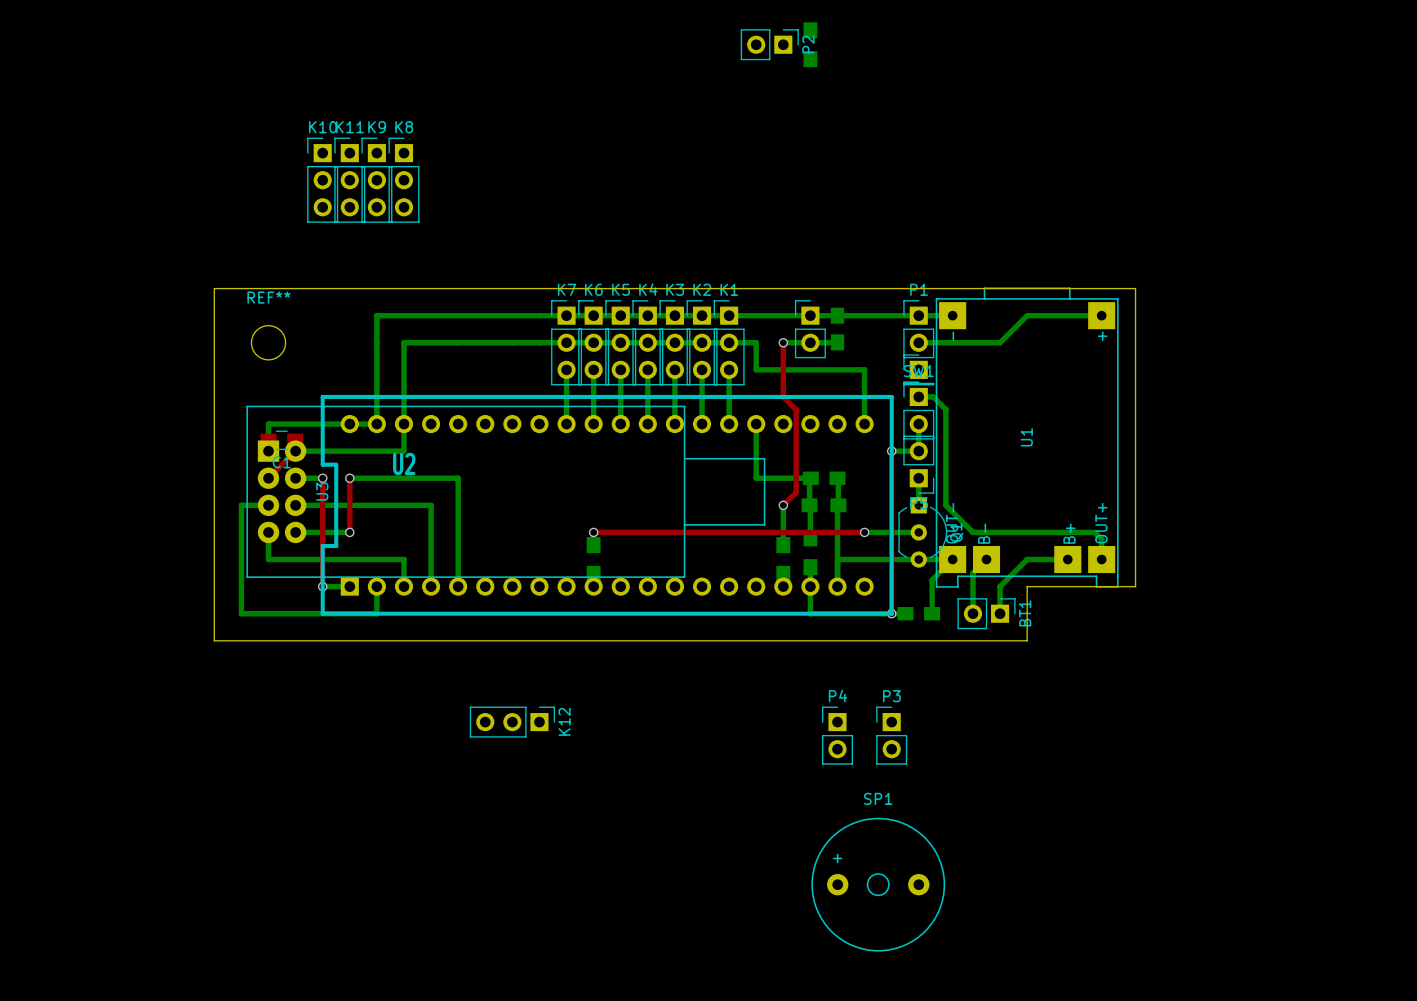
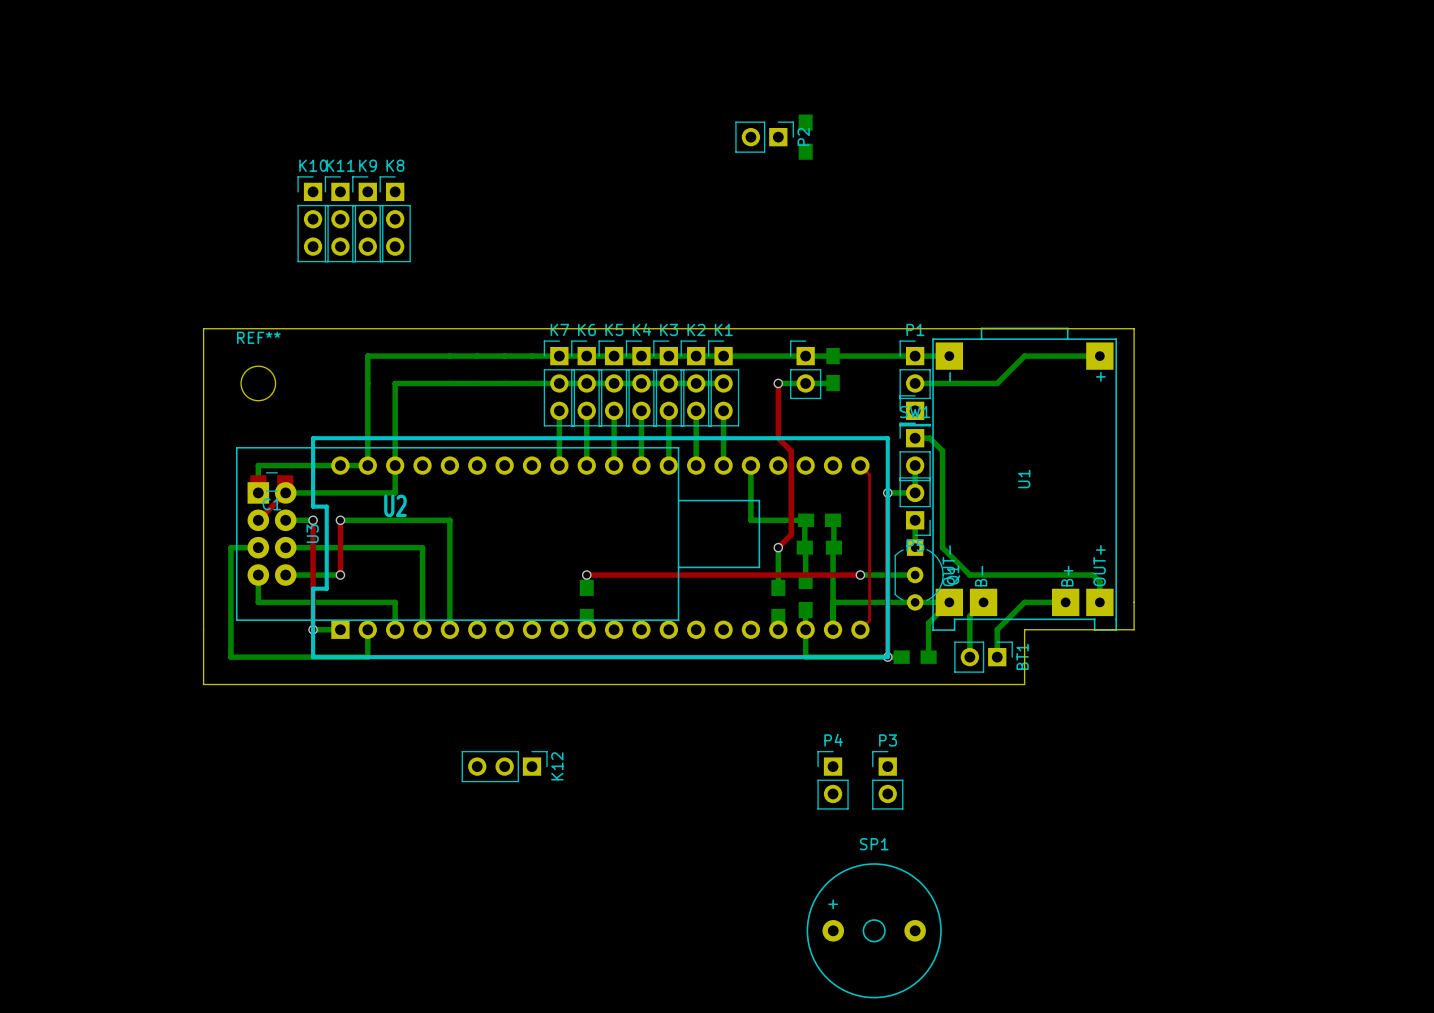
P2 position: (769, 44) -> (764, 137)
part position: (810, 44) -> (805, 137)
bottom track: (729, 342) (756, 342) (756, 369) (864, 369) (864, 424) -> none
top track: none -> (860, 465) (869, 474) (869, 620) (860, 629)

